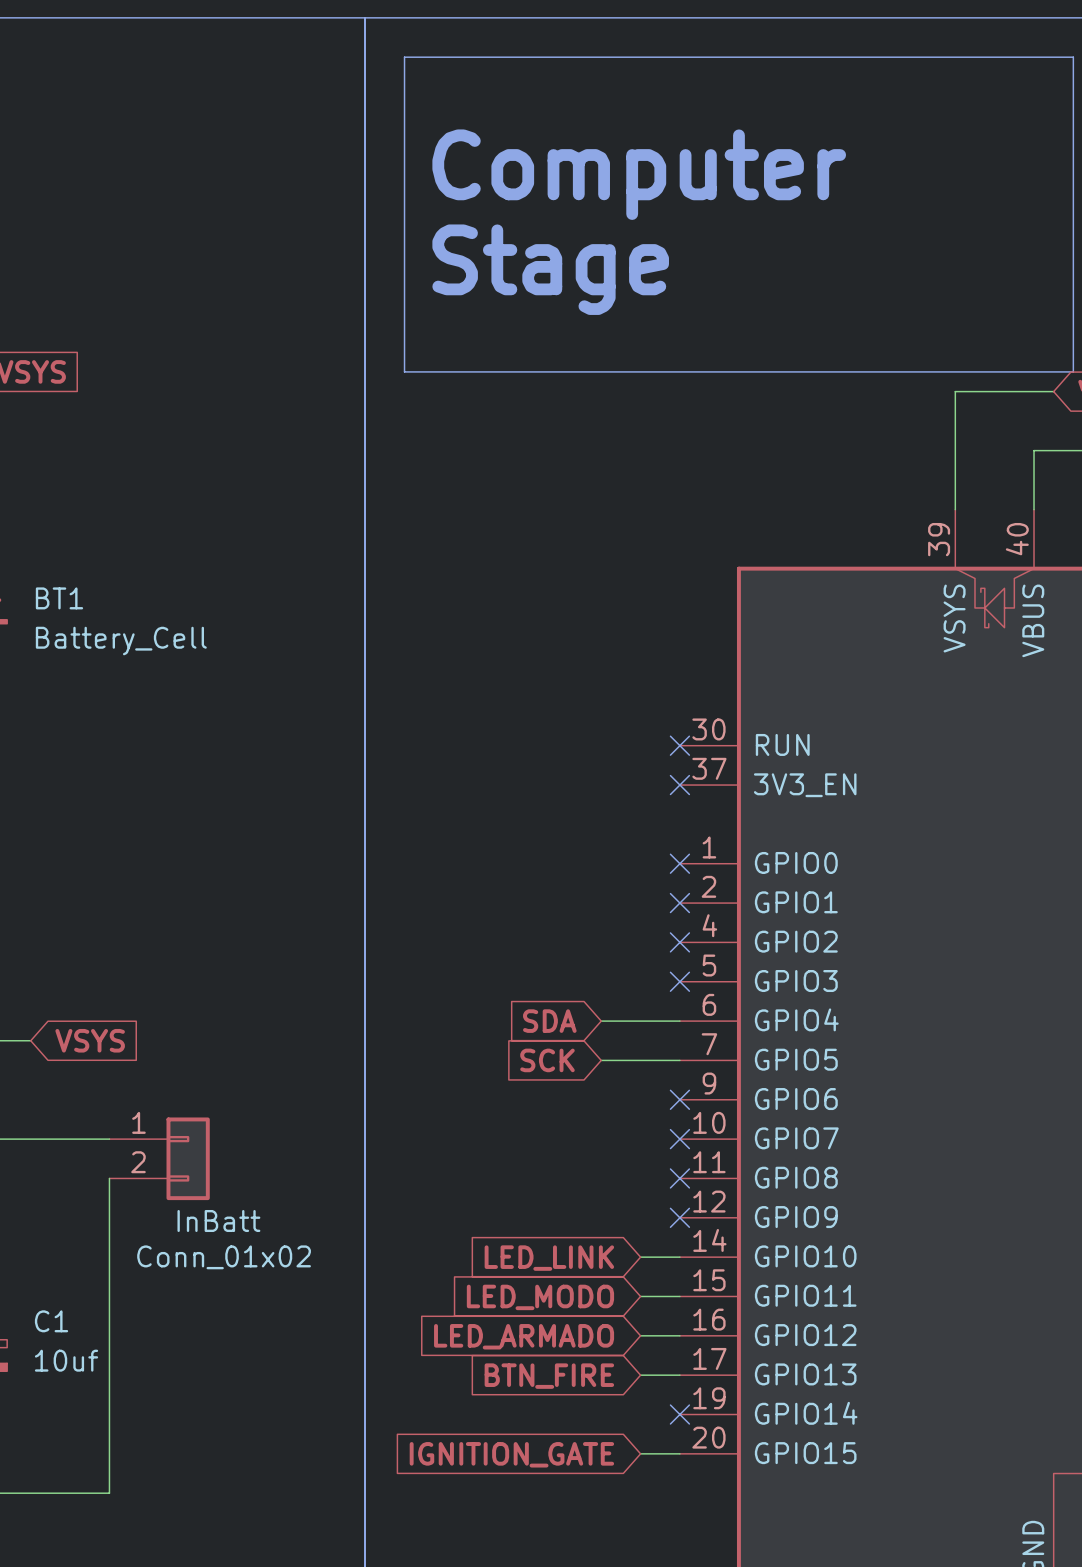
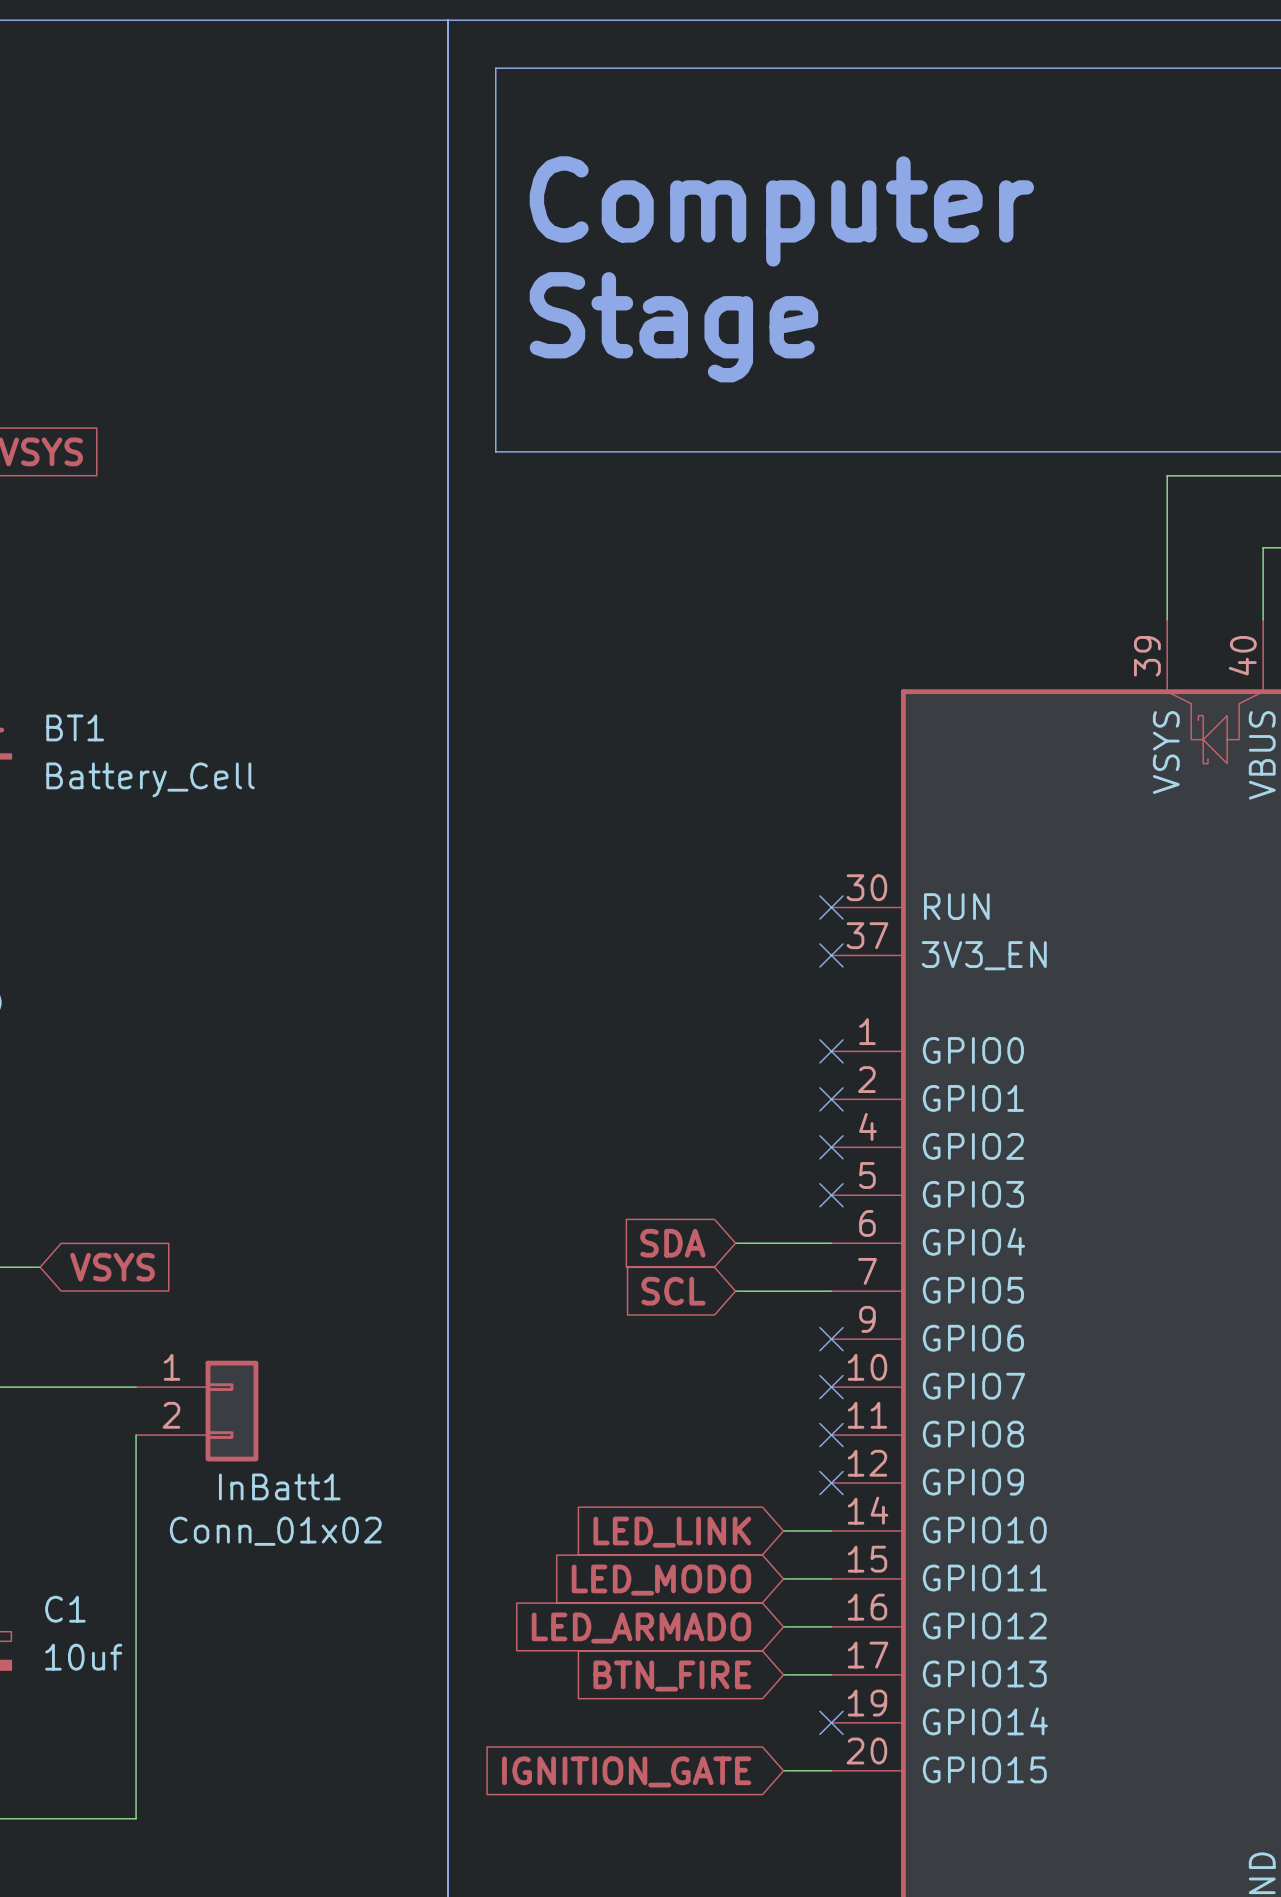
global label: SCK (547, 1060) -> SCL (673, 1291)
InBatt name: InBatt (218, 1221) -> InBatt1 (279, 1486)

